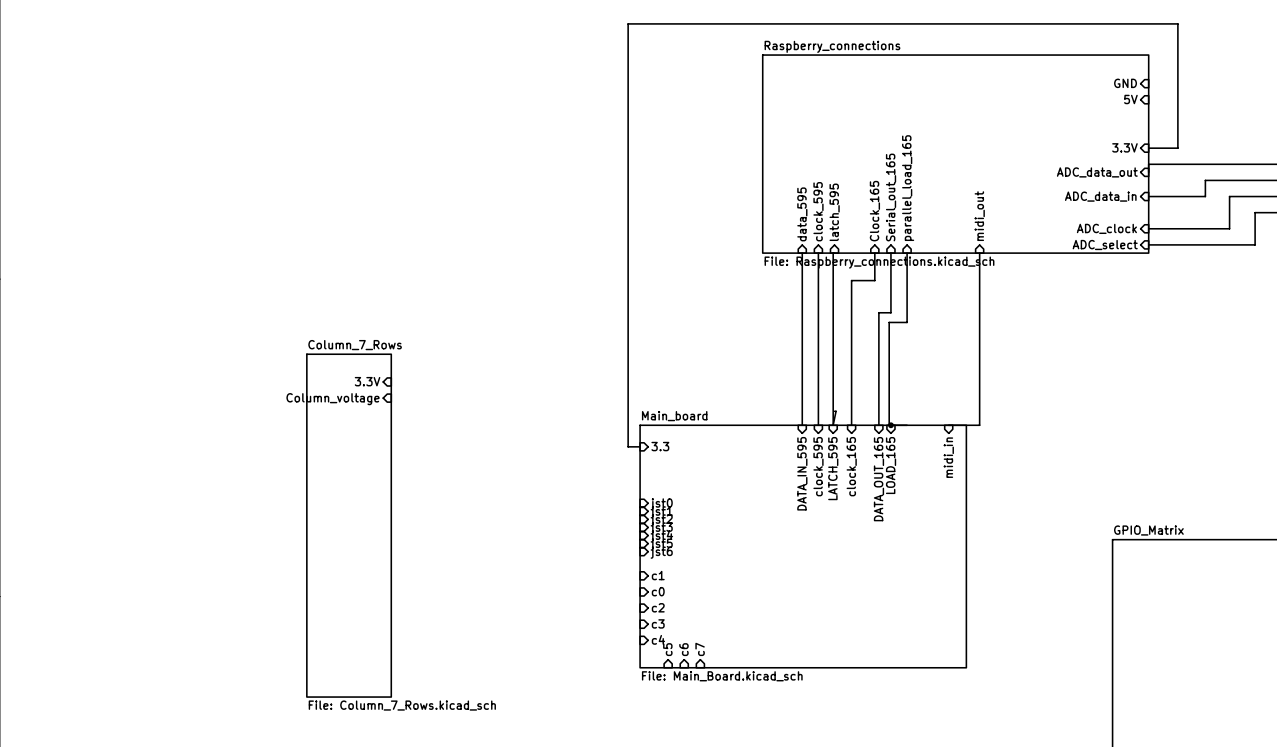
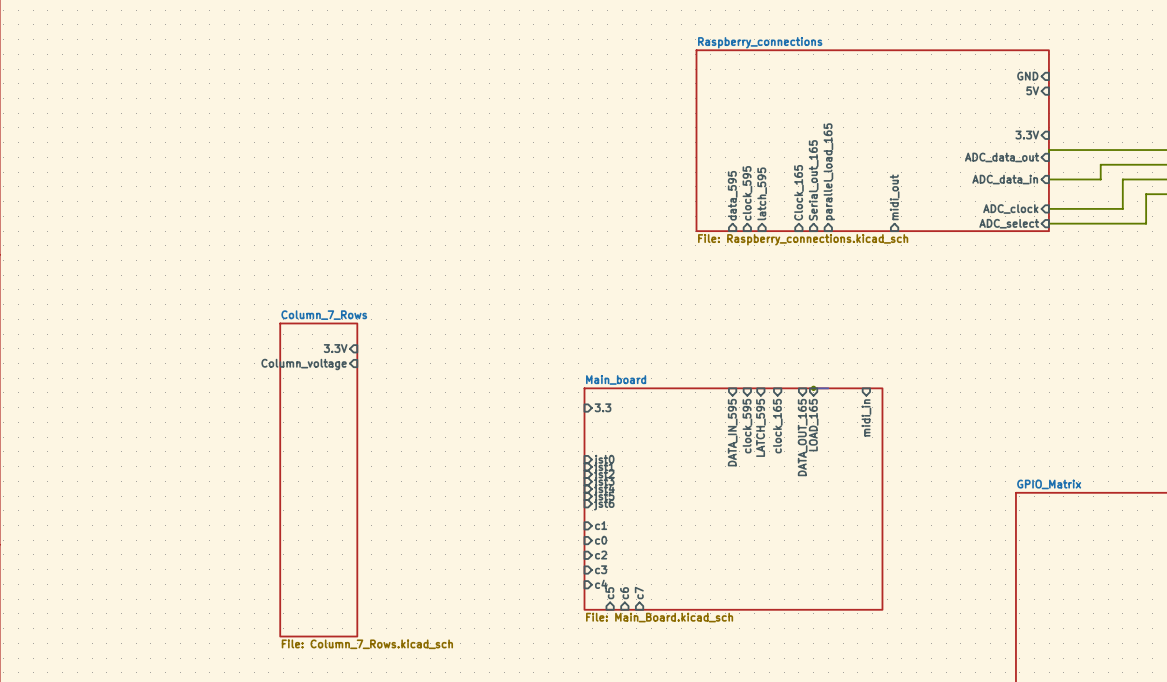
wire: (1148, 148) (1177, 148) (1177, 23) (628, 23) (628, 446) (640, 446) -> none
wire: (802, 253) (802, 425) -> none
wire: (818, 253) (818, 425) -> none
wire: (834, 253) (833, 425) -> none
wire: (874, 253) (874, 280) (851, 280) (851, 425) -> none
wire: (890, 253) (890, 312) (878, 312) (878, 425) -> none
wire: (907, 253) (907, 322) (889, 322) (889, 425) (891, 425) -> none
wire: (979, 253) (979, 425) (948, 425) -> none
bus: (834, 411) (836, 411) (833, 425) -> none

